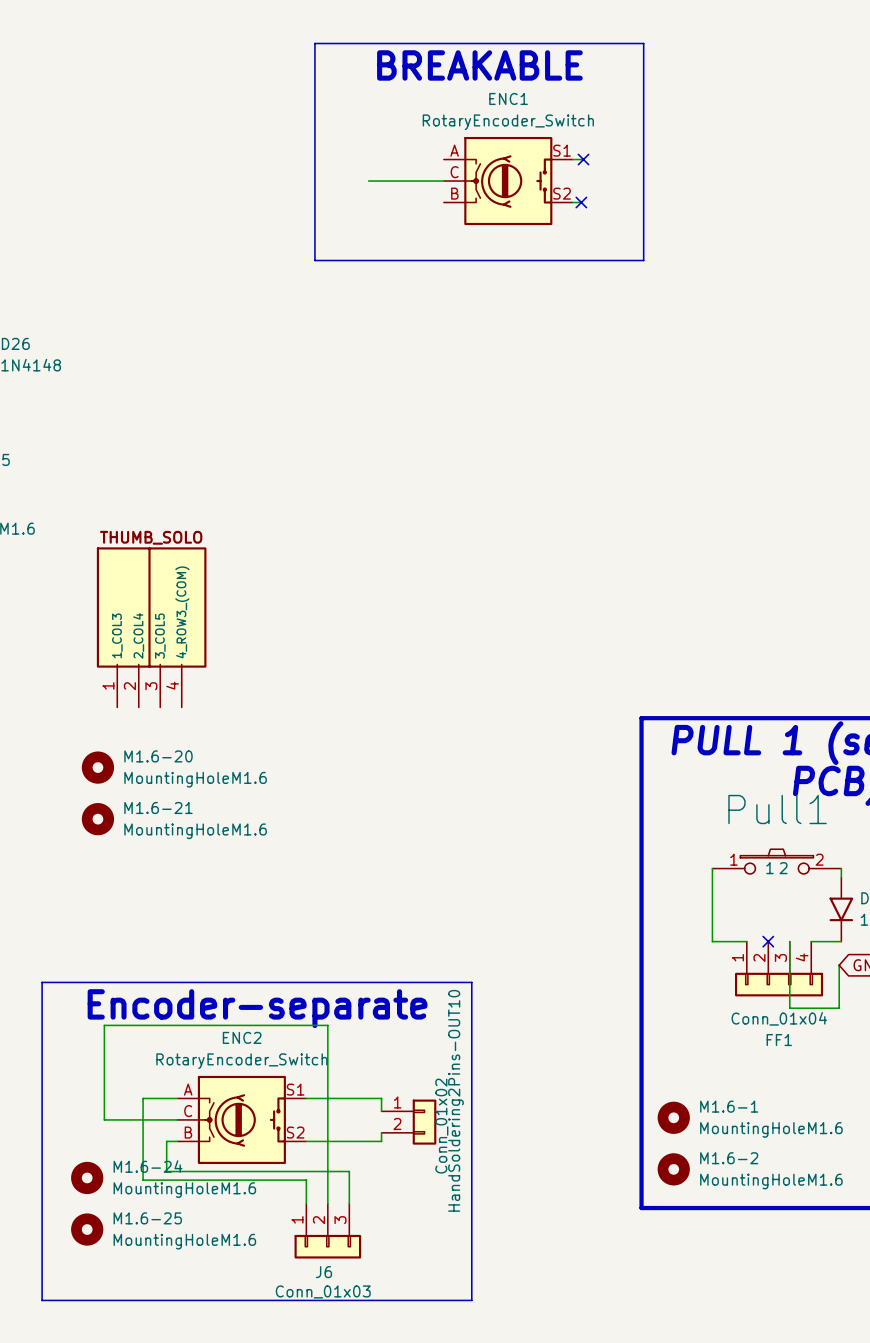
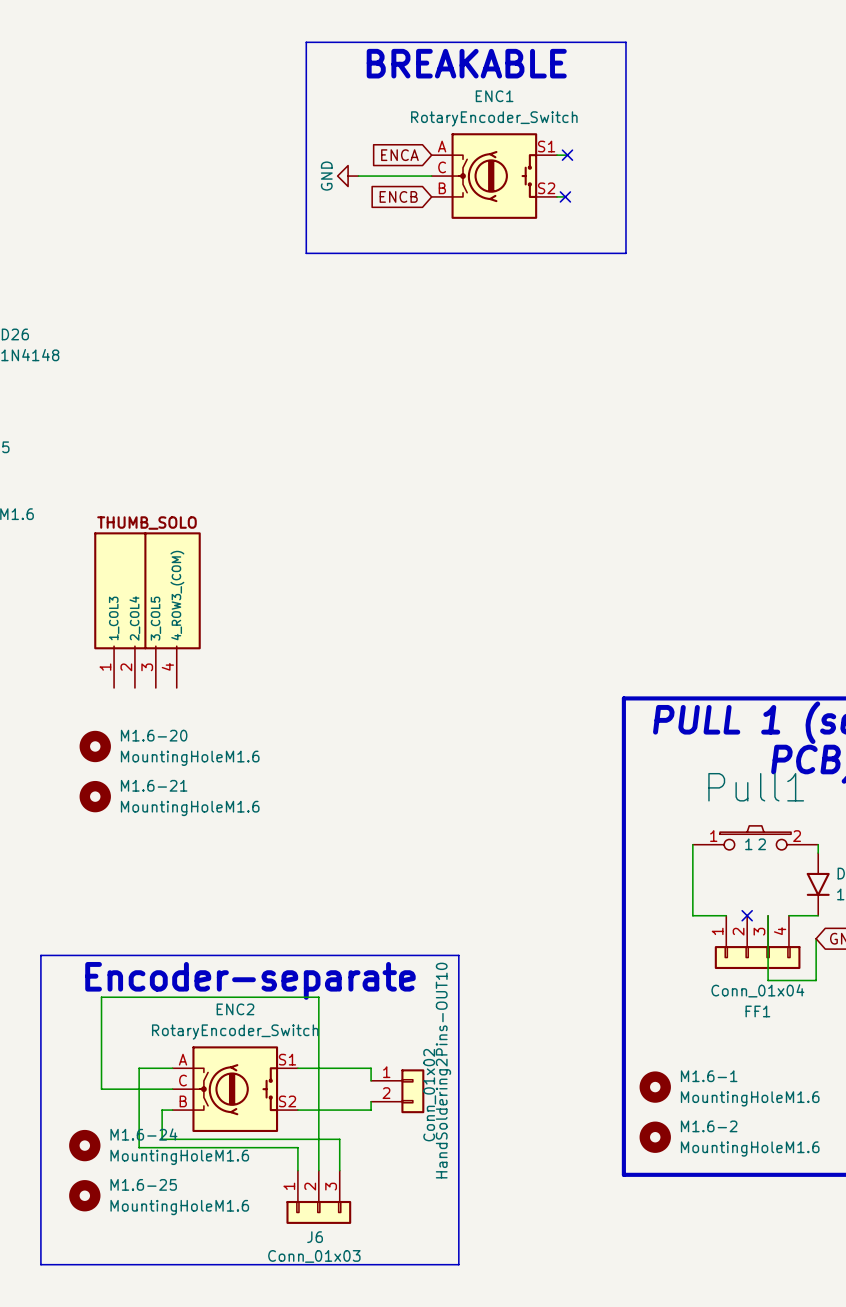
global label: none -> ENCA (399, 155)
power symbol: none -> GND (348, 176)
global label: none -> ENCB (398, 196)

